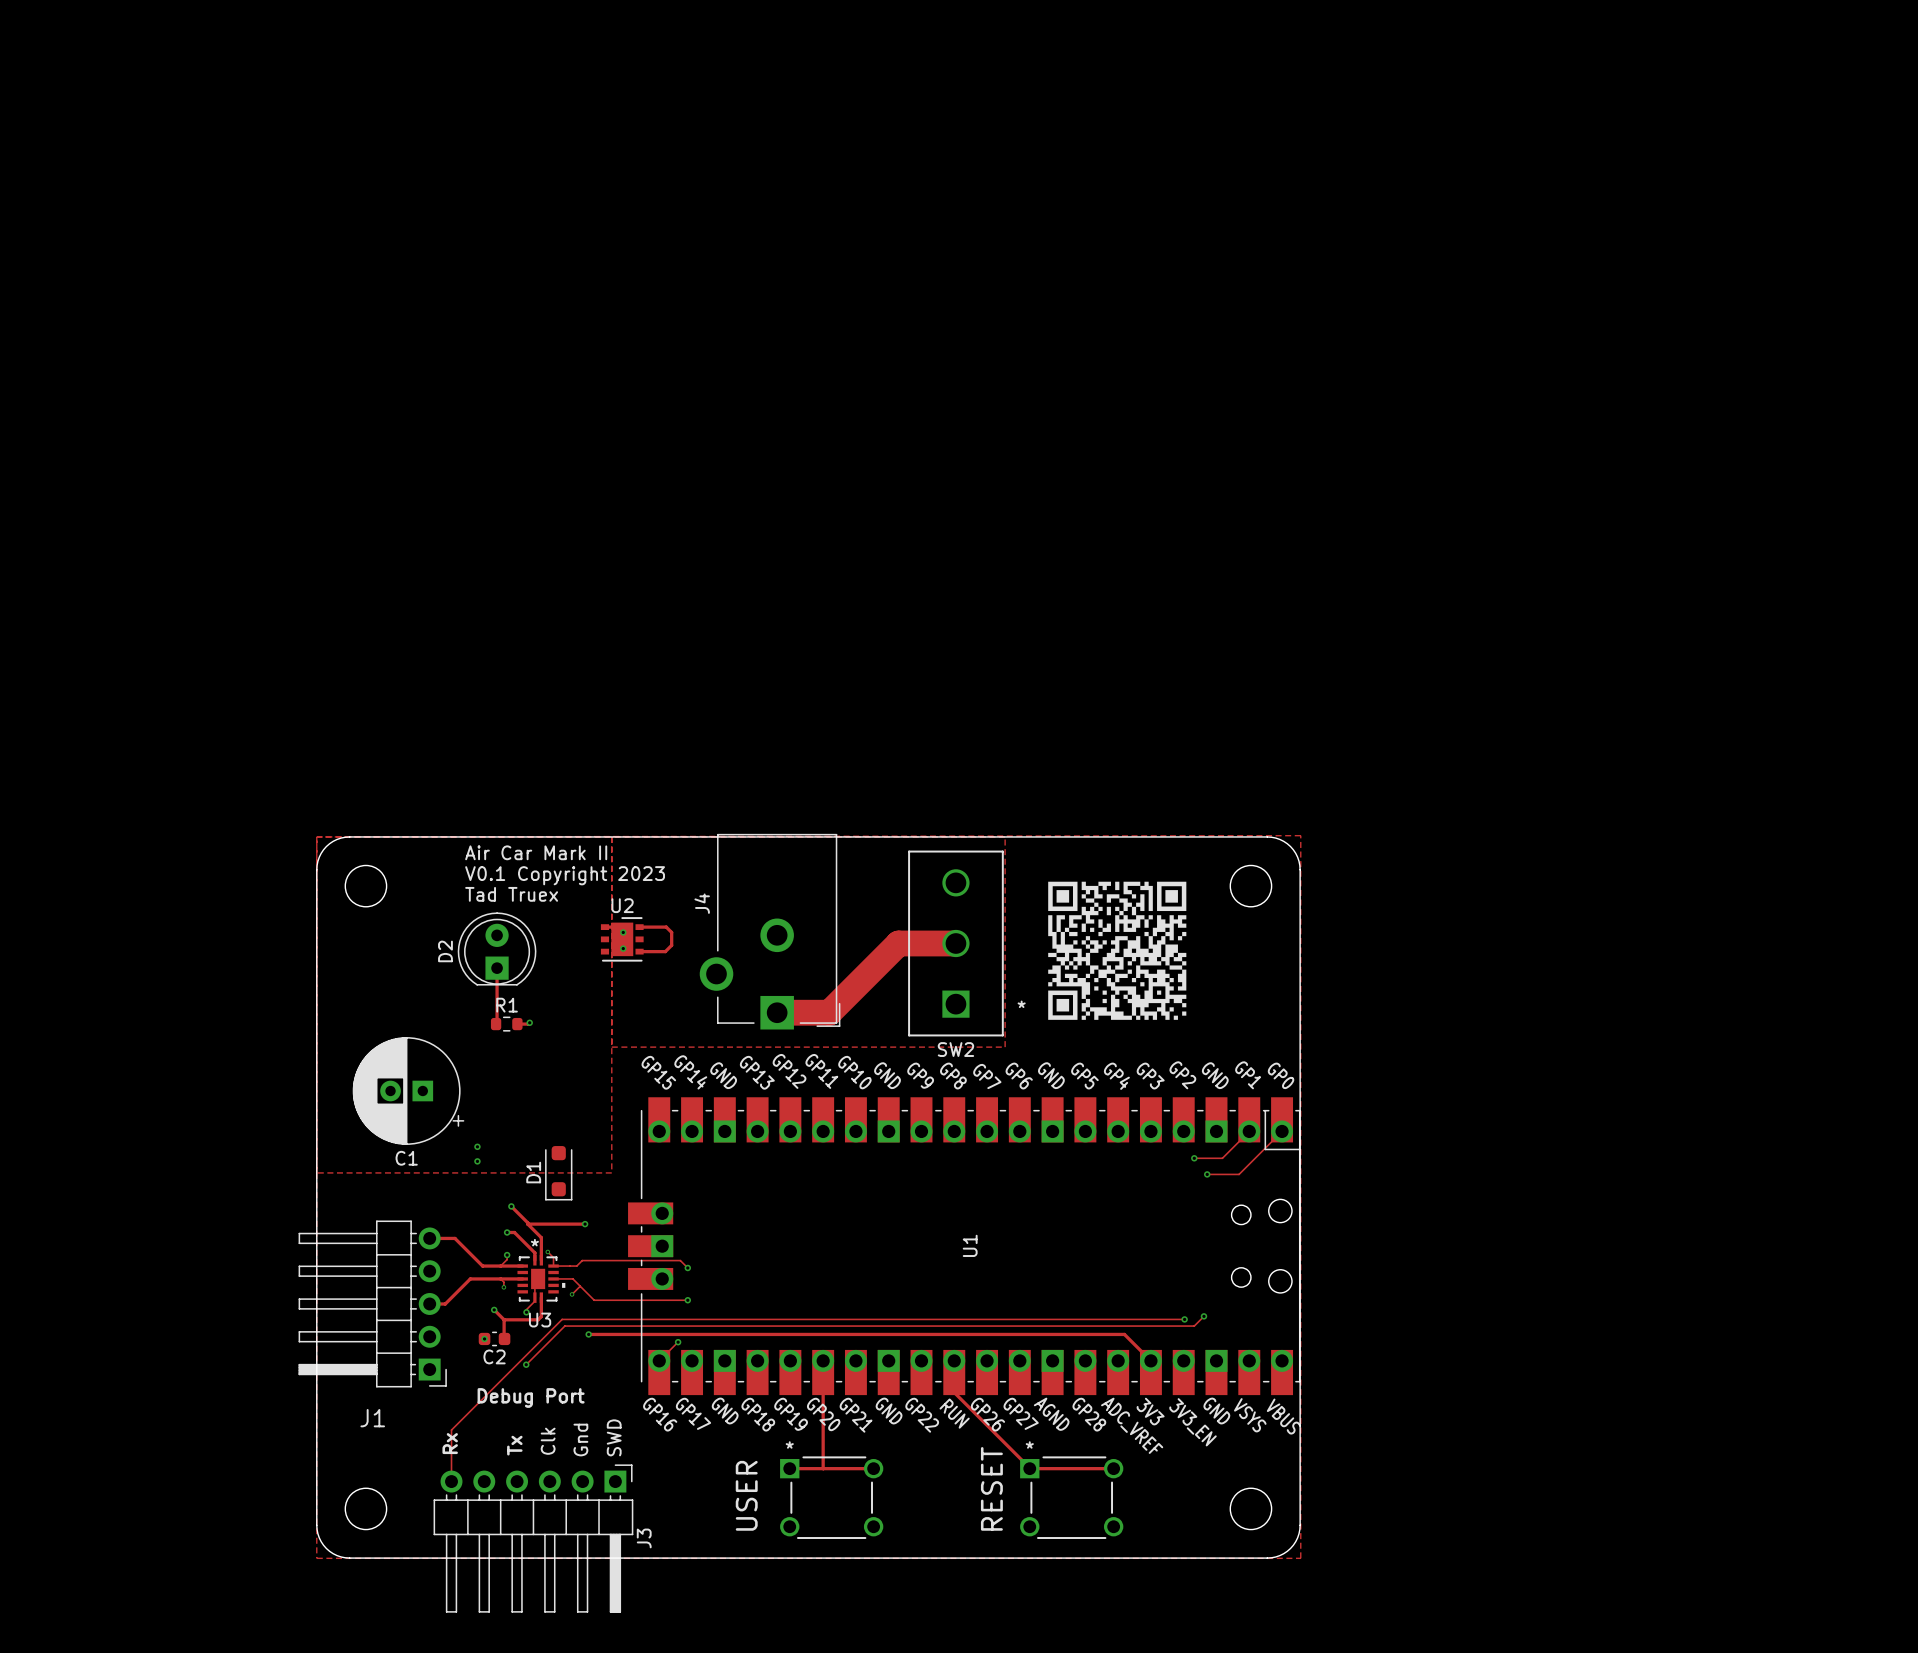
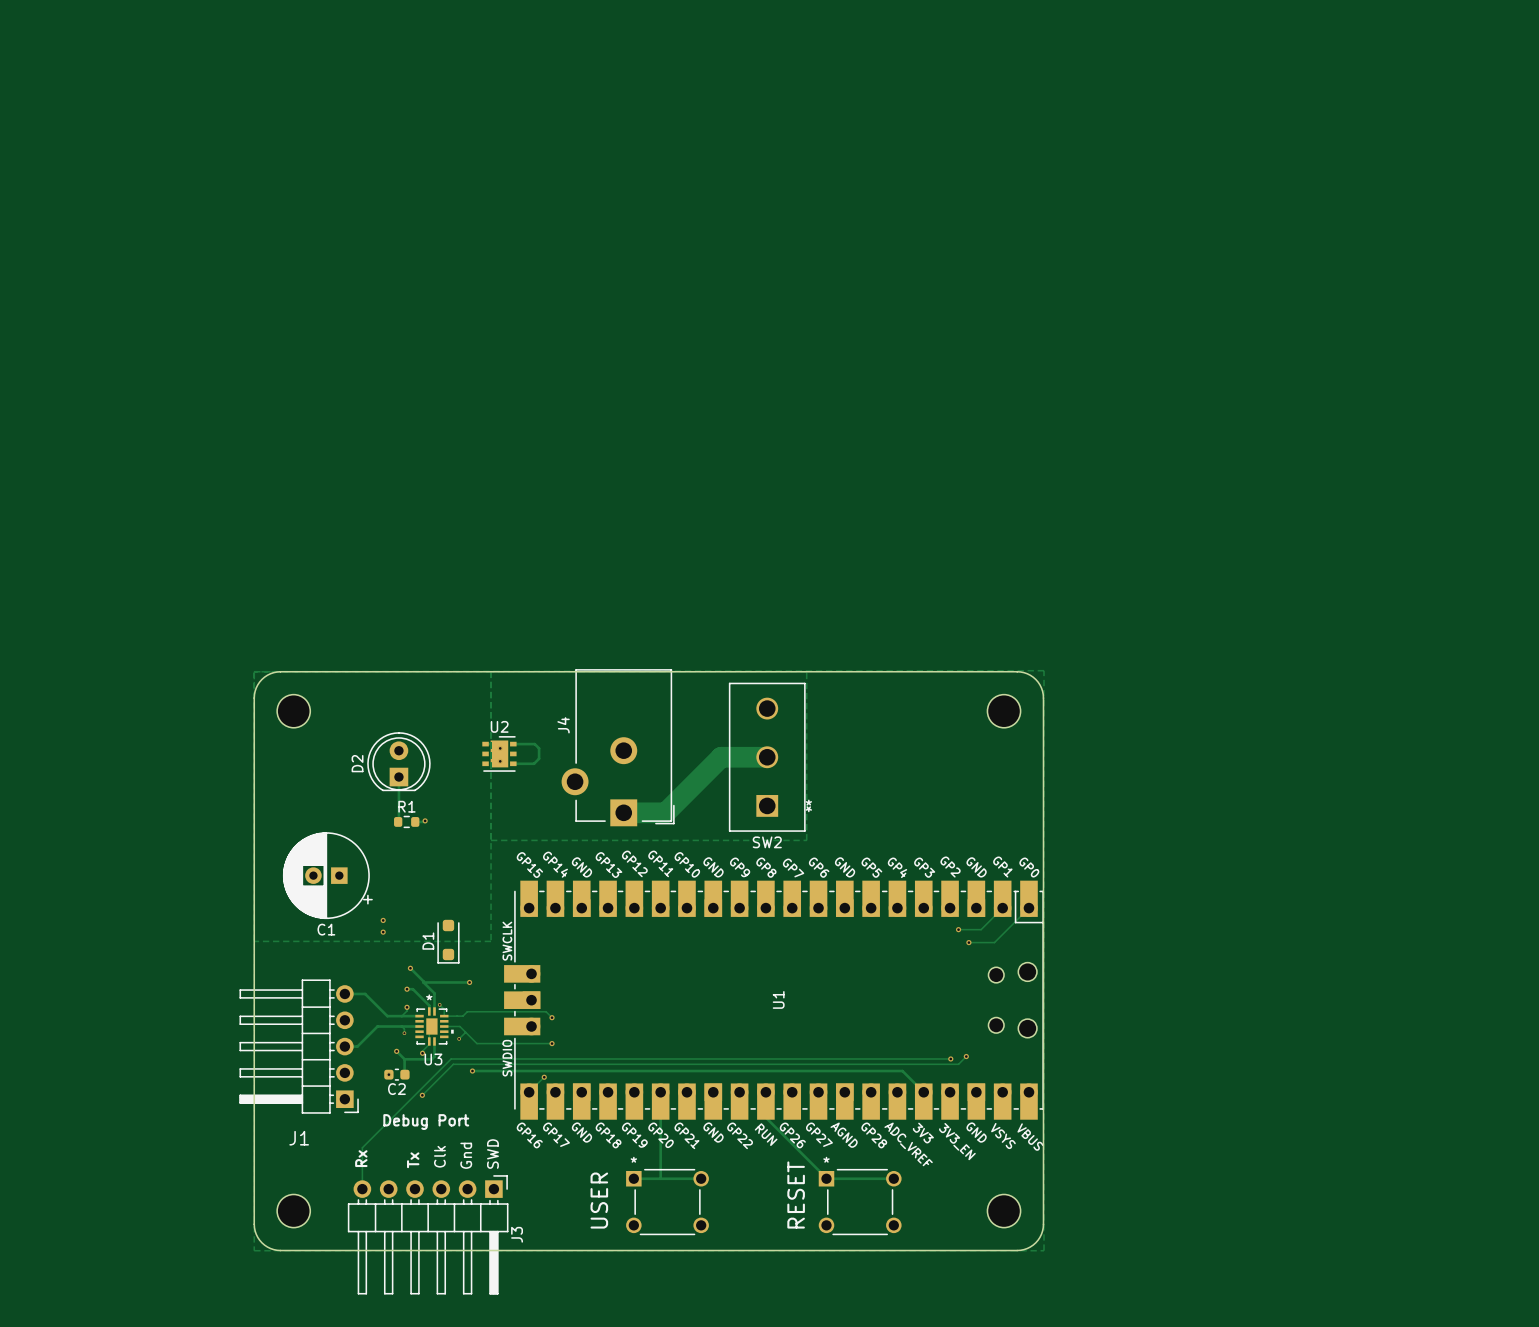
SW2 footprint: [908, 850, 1004, 1037] -> [728, 682, 806, 832]
text: Air Car Mark II (536, 852) -> none
text: V0.1 Copyright 2023 (565, 875) -> none
drawing: [1048, 881, 1187, 1020] -> none
text: Tad Truex (511, 894) -> none
U1 footprint: [628, 1097, 1301, 1396] -> [504, 880, 1044, 1120]

